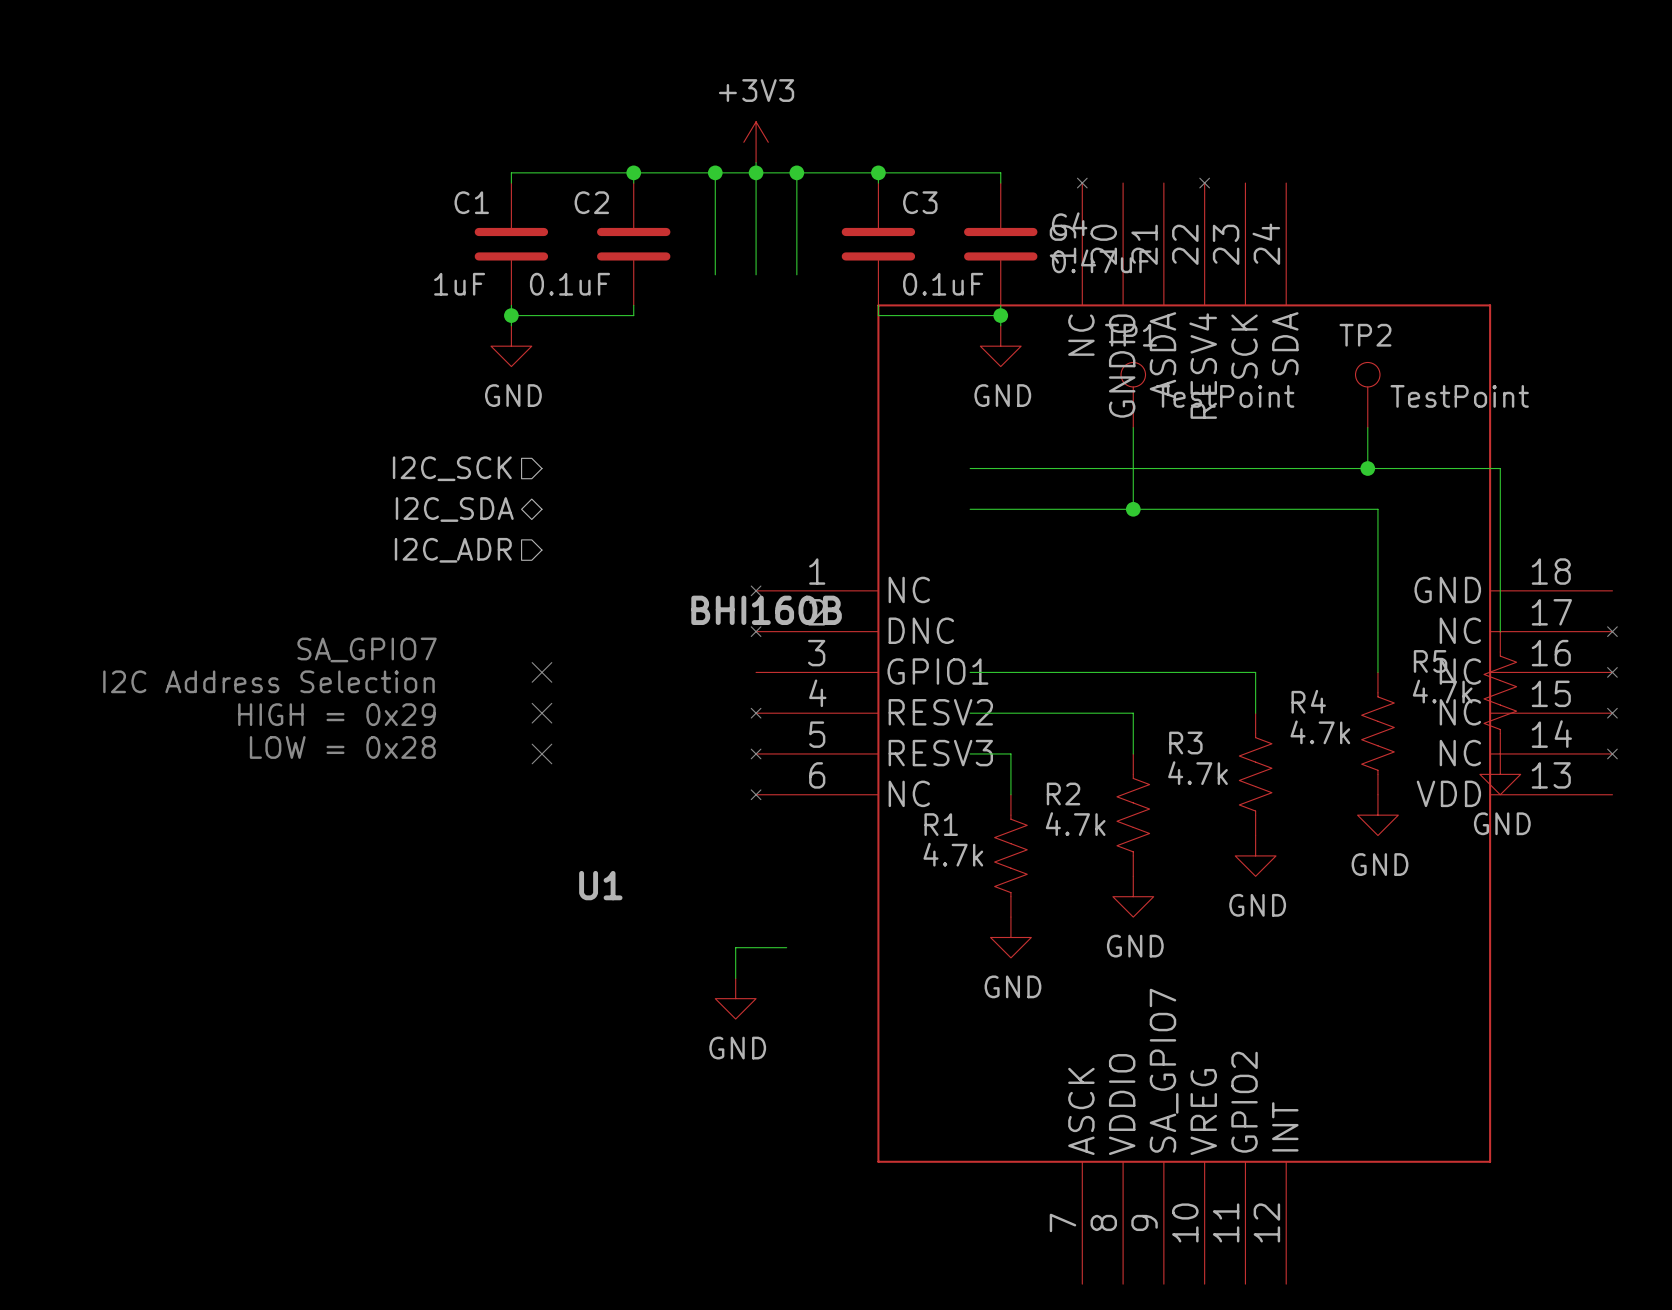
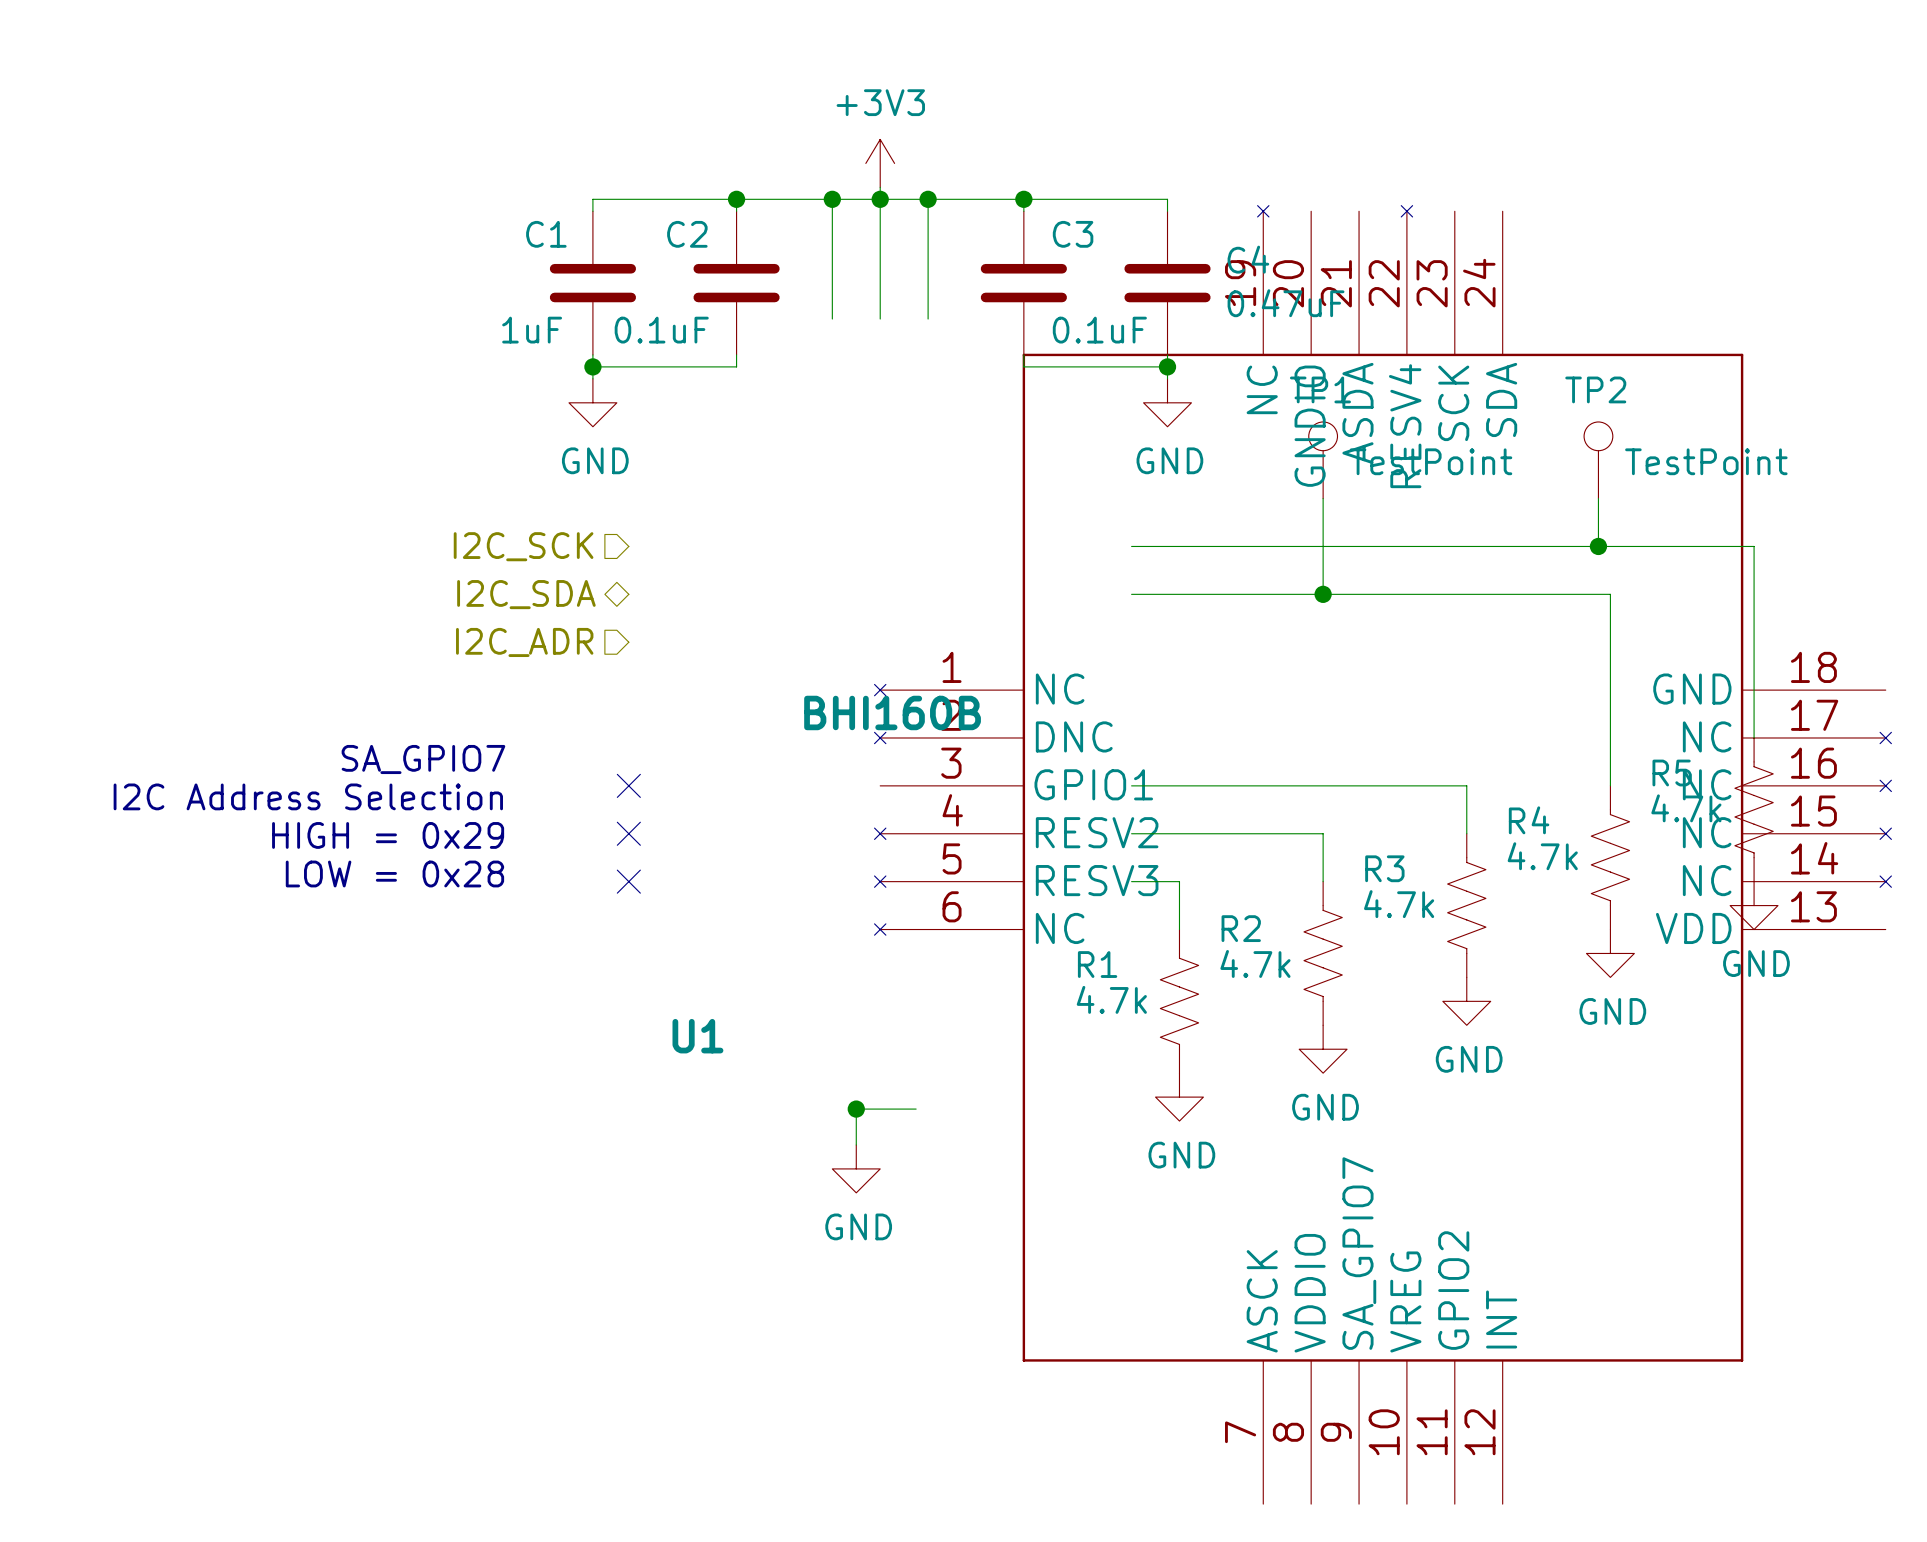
junction: none -> (856, 1109)

